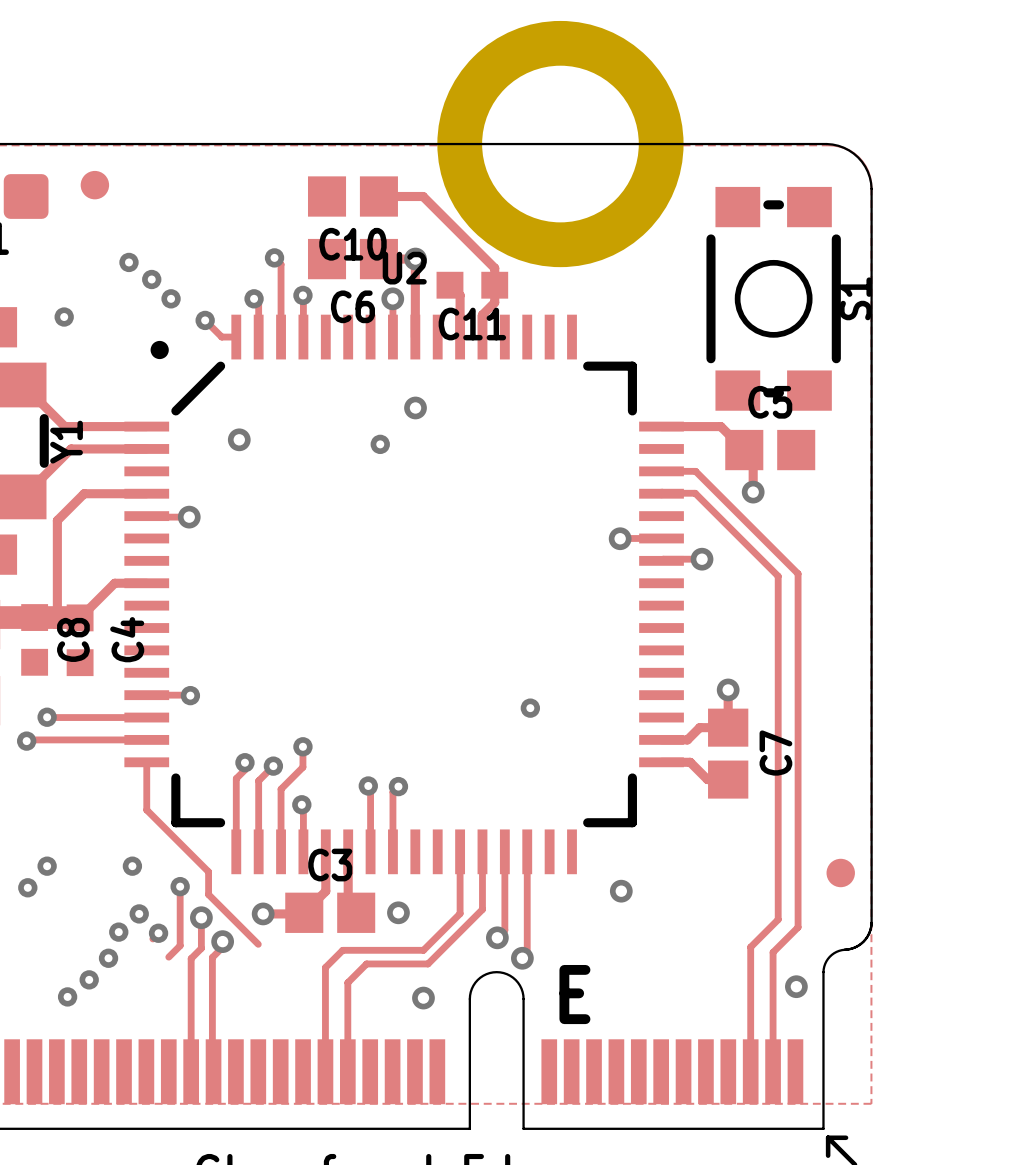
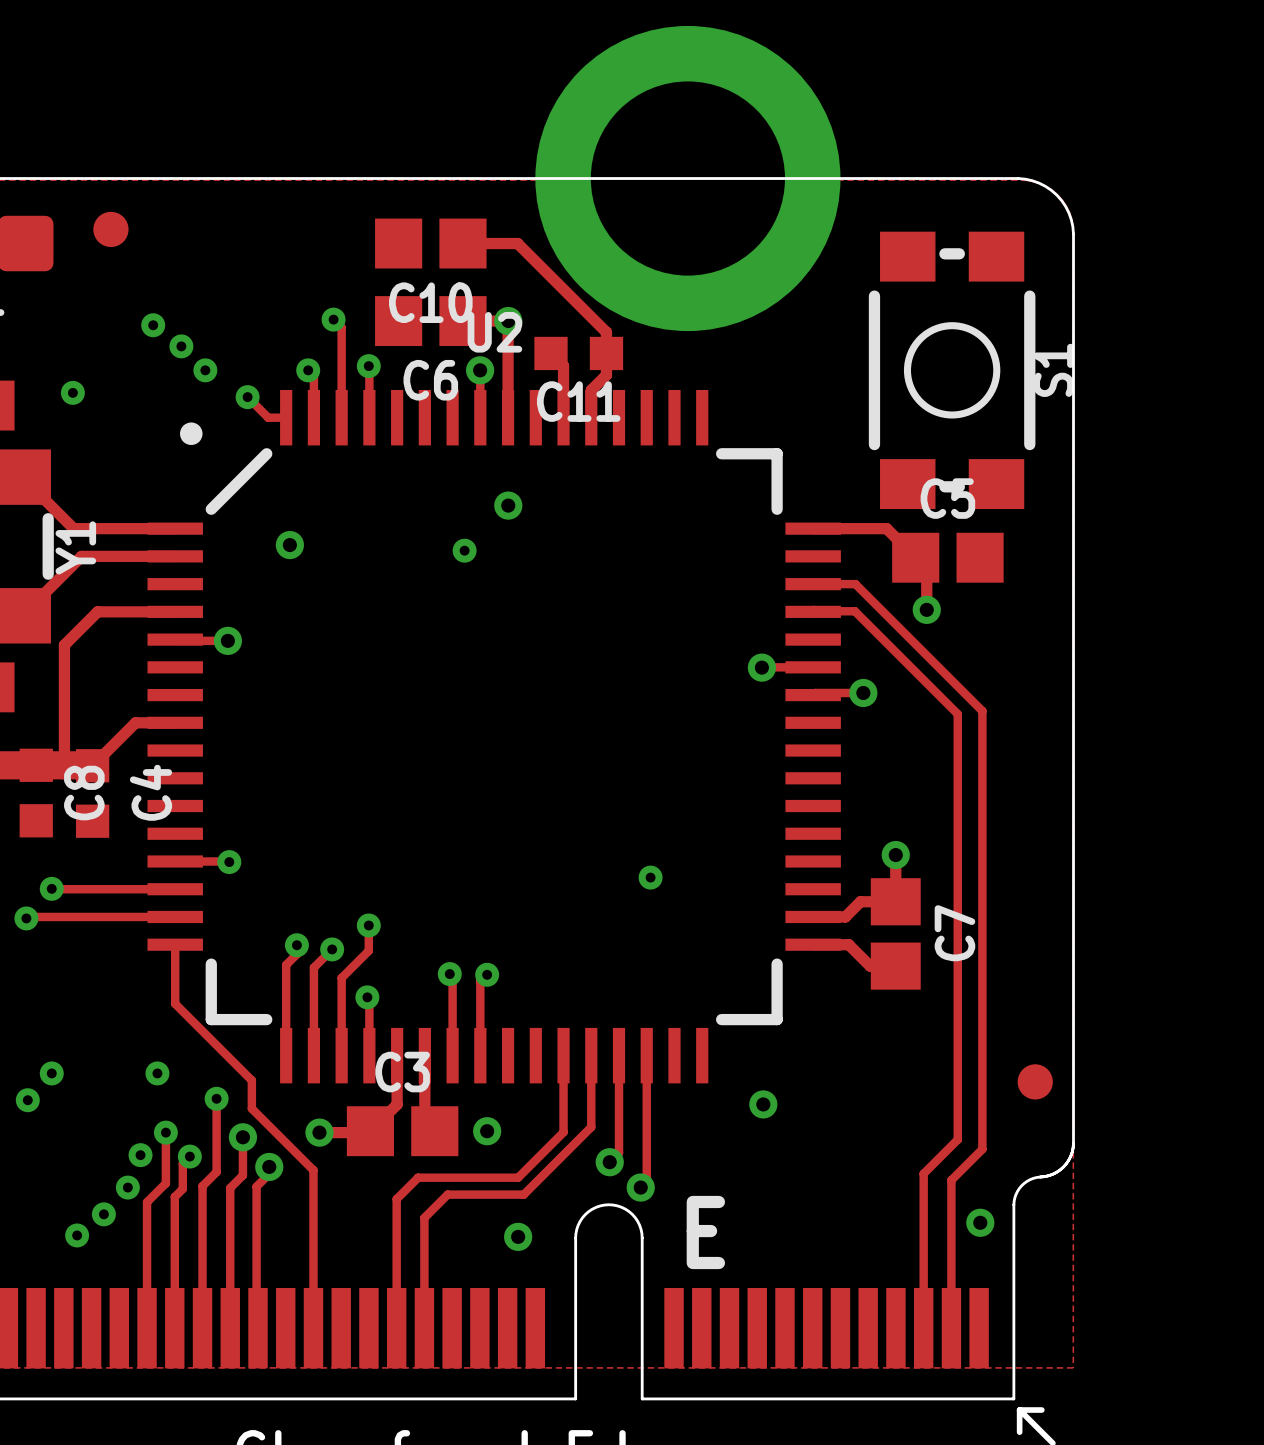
track: none -> (165, 1132) (165, 1183) (147, 1202) (147, 1328)
track: none -> (182, 1163) (182, 1188) (174, 1196) (174, 1328)
track: none -> (313, 1170) (313, 1328)
track: none -> (202, 1186) (202, 1328)

